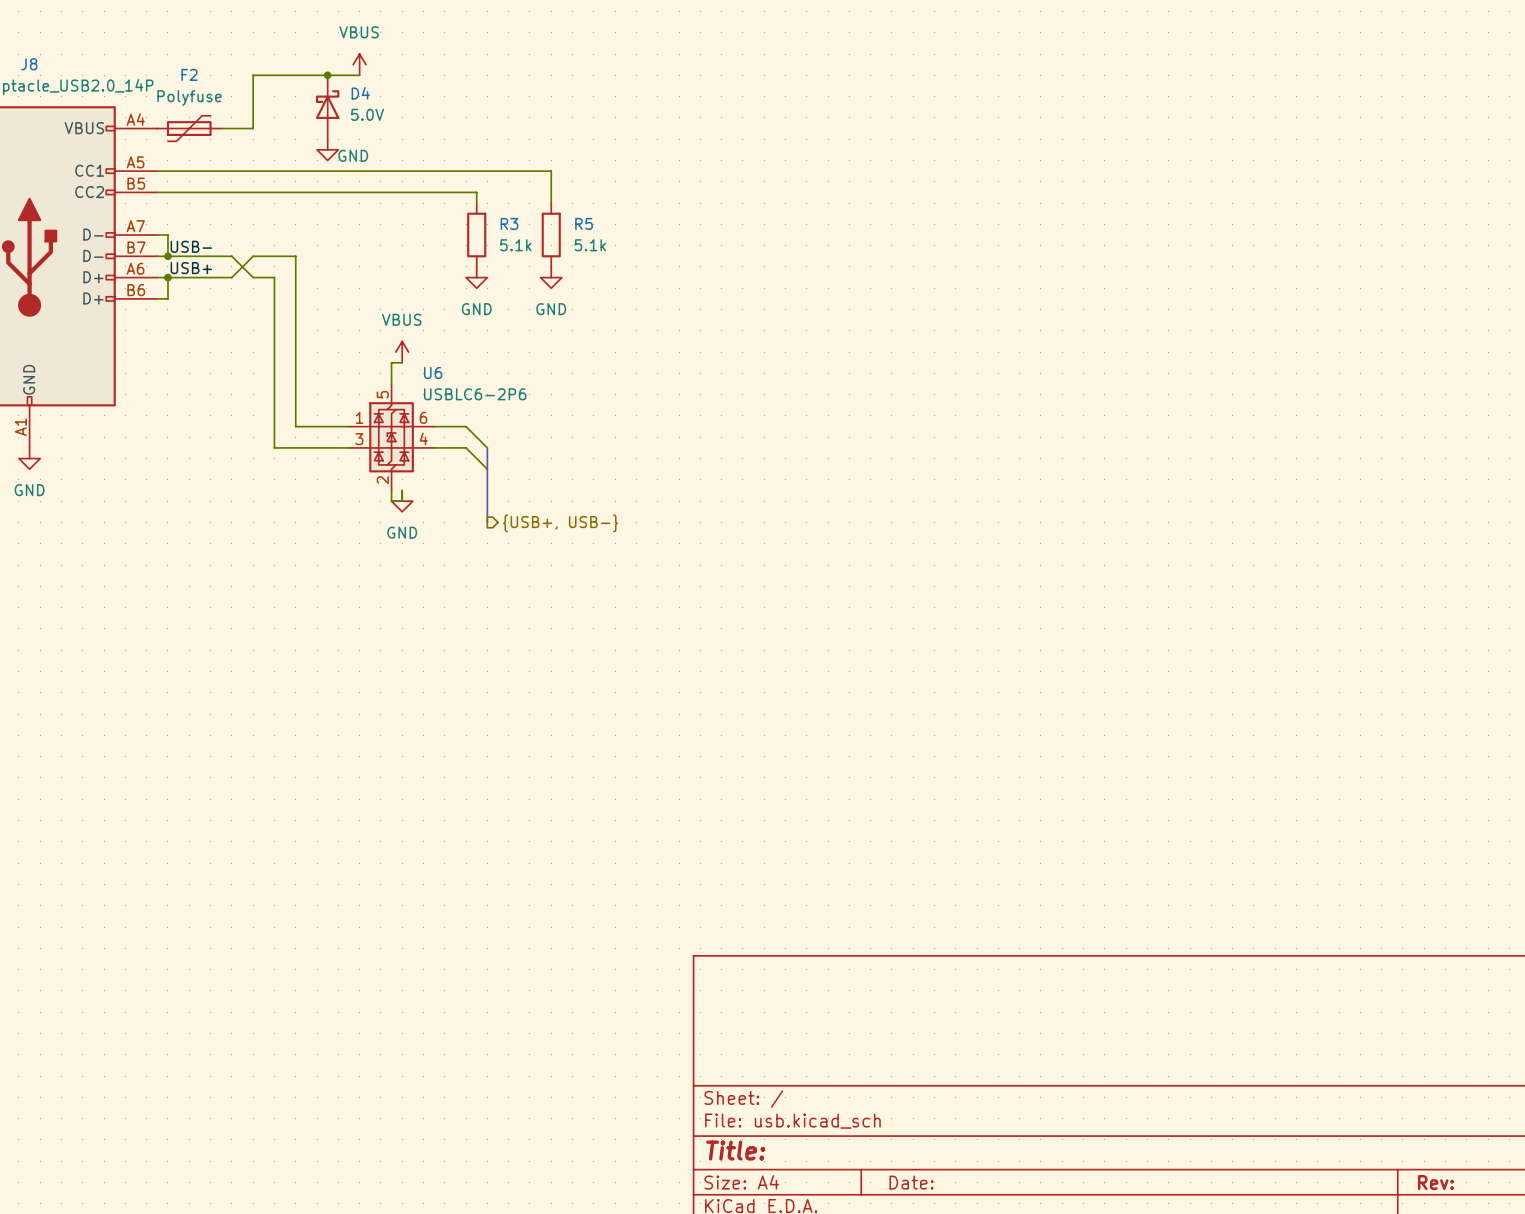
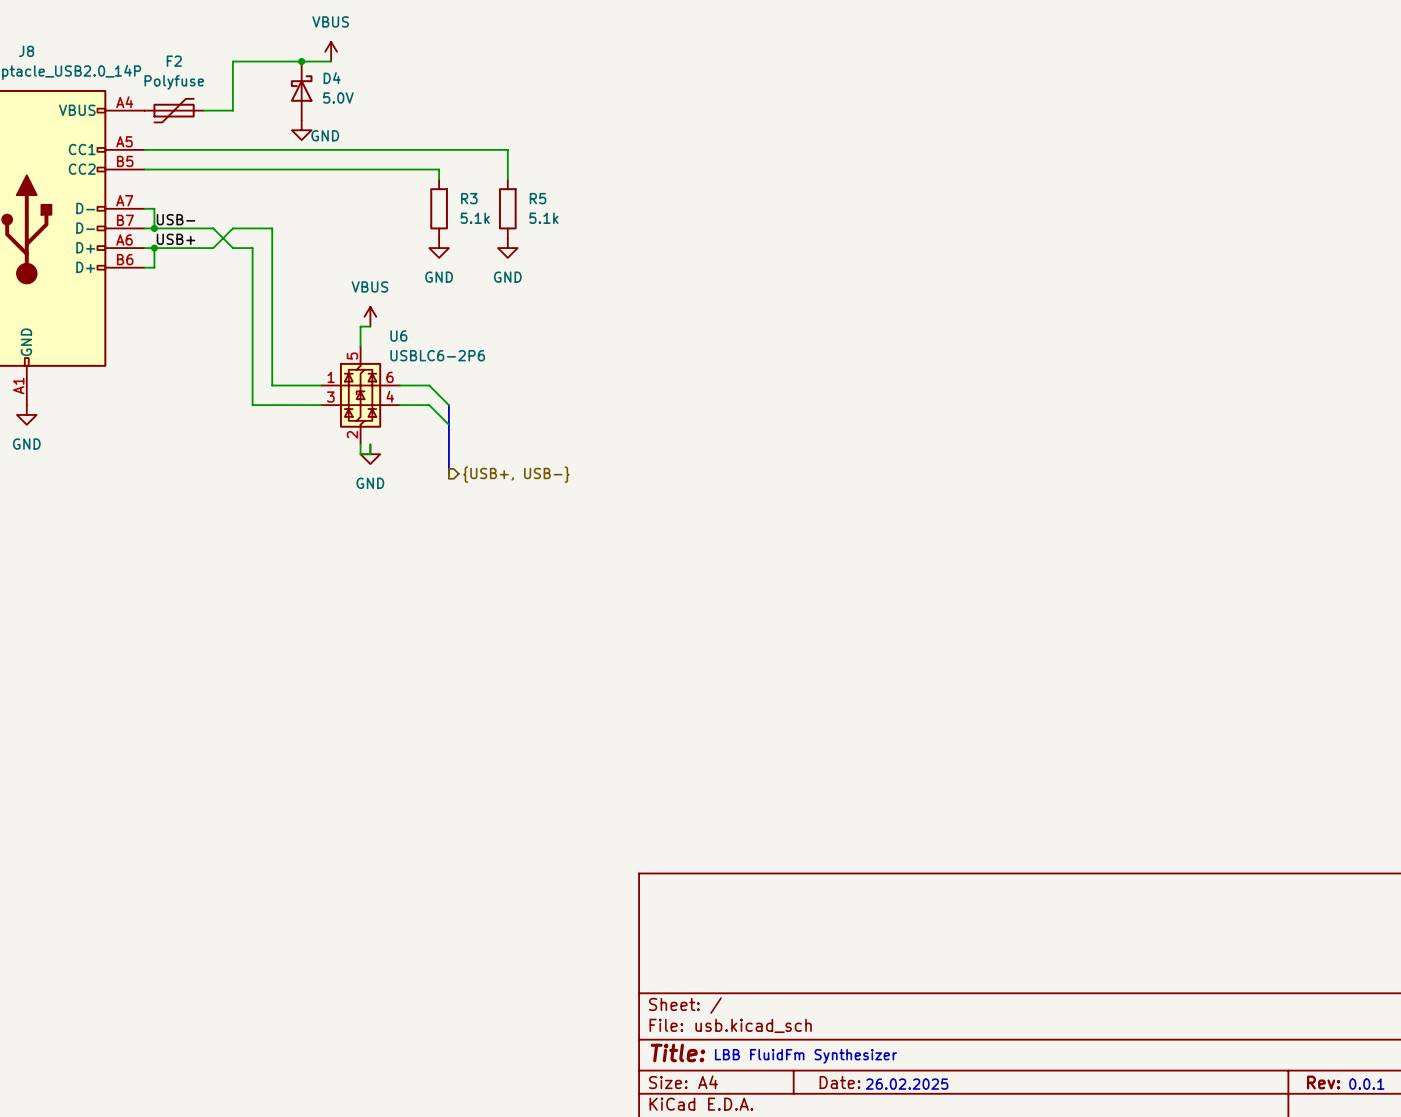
text: none -> LBB FluidFm Synthesizer (805, 1056)
text: none -> 26.02.2025 (907, 1084)
text: none -> 0.0.1 (1366, 1084)

